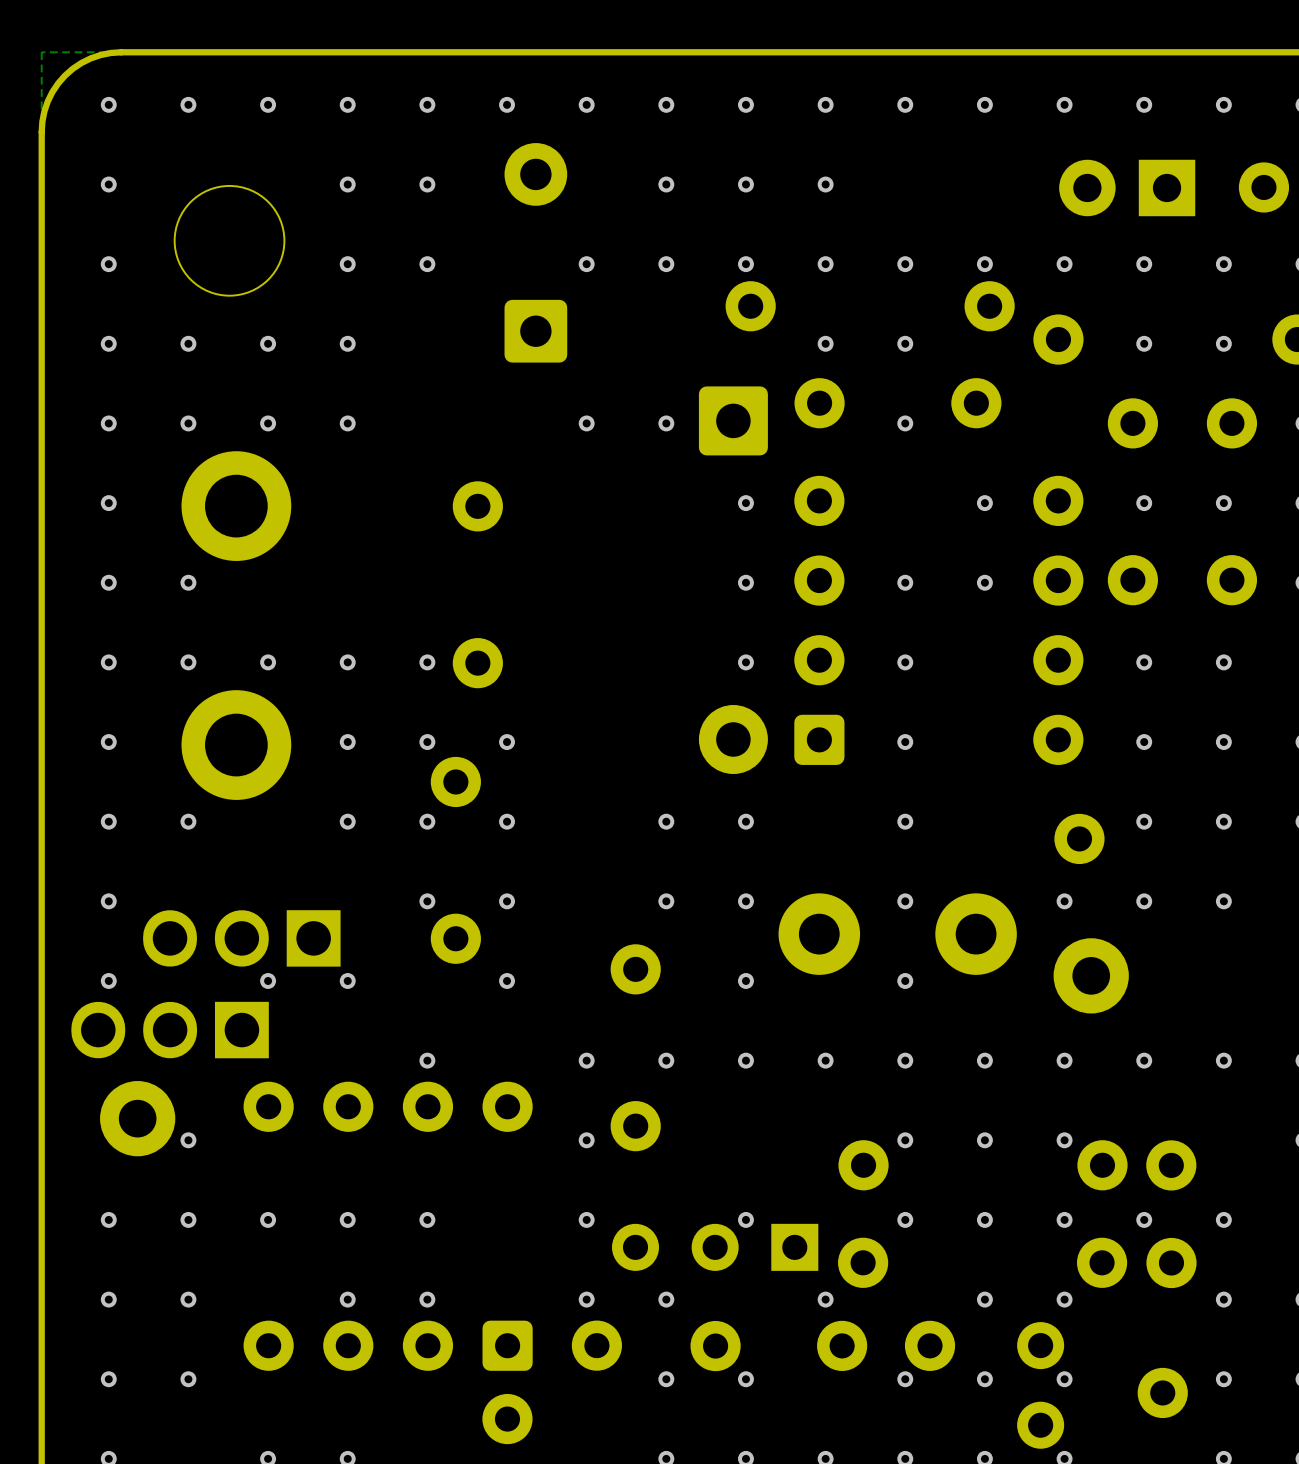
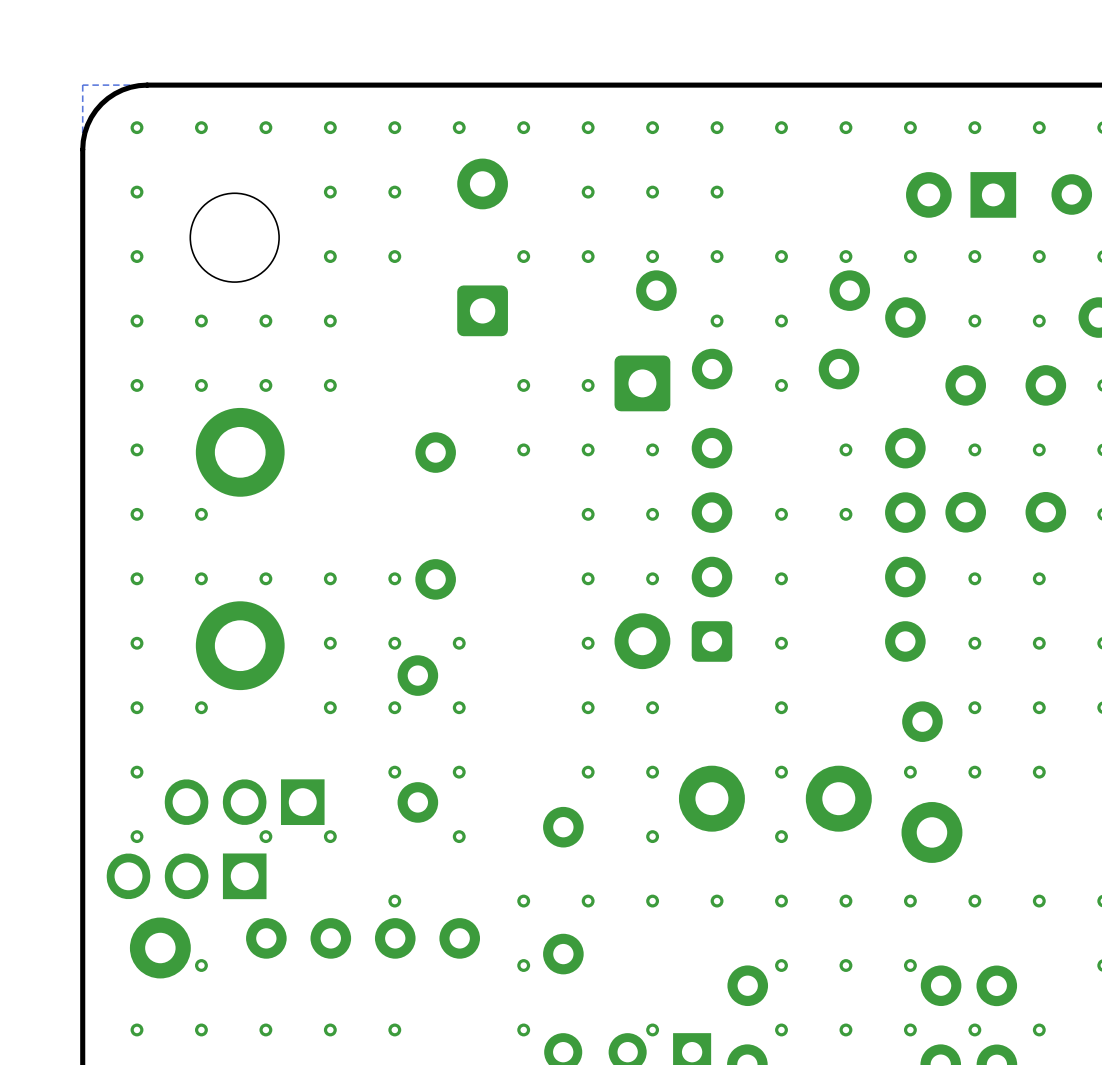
via: none -> (523, 449)
via: none -> (588, 449)
via: none -> (588, 514)
via: none -> (588, 578)
via: none -> (588, 643)

